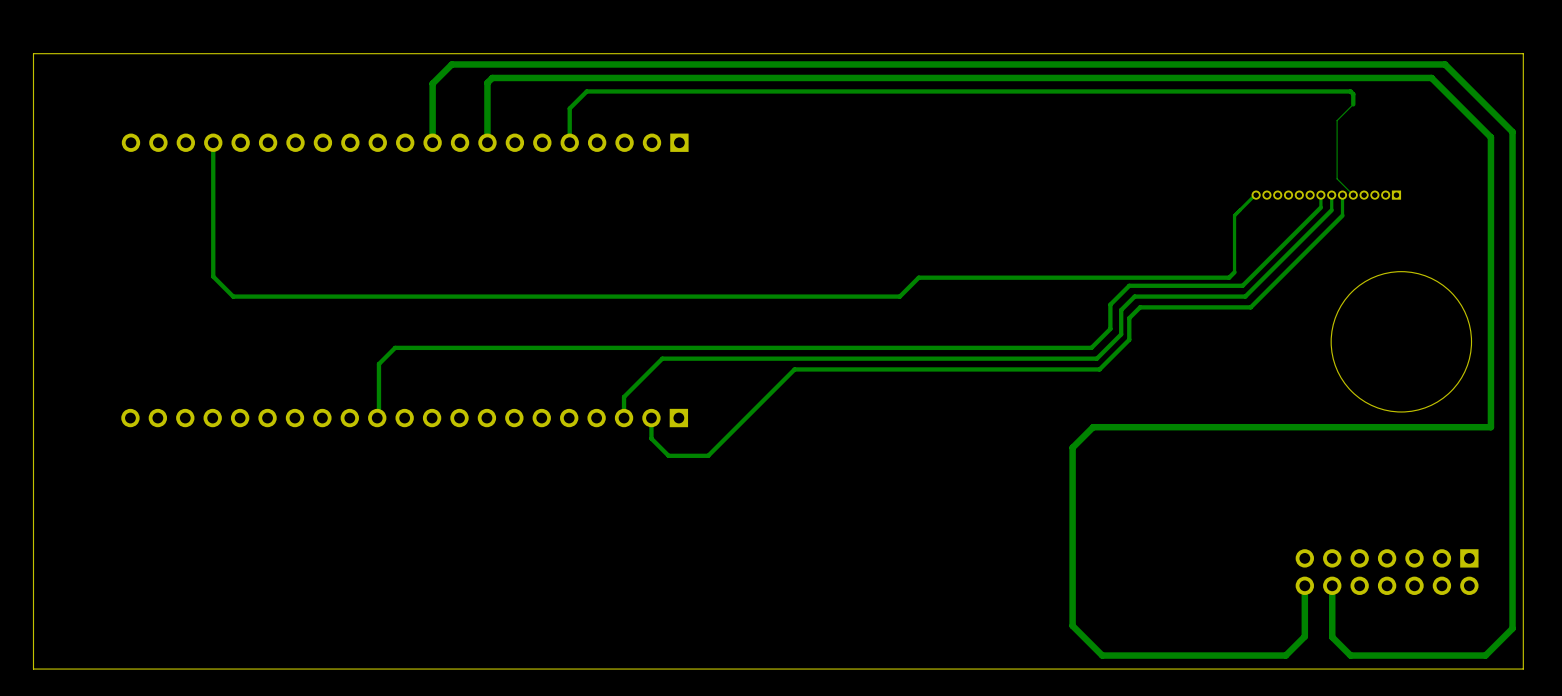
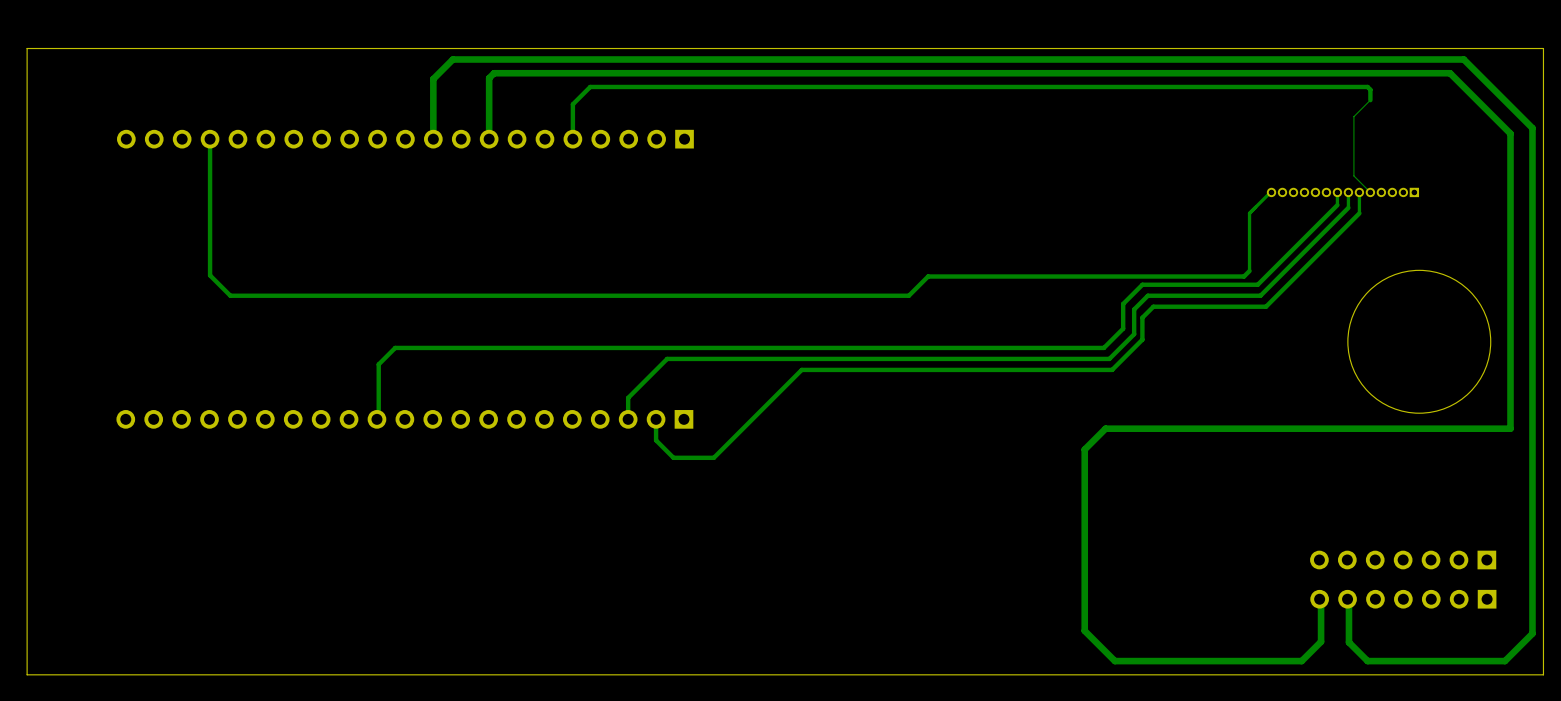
part: none -> (1403, 560)
part: (1387, 572) -> none
part: none -> (1403, 599)

